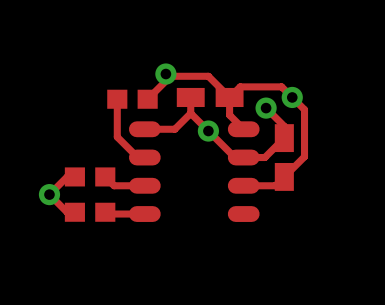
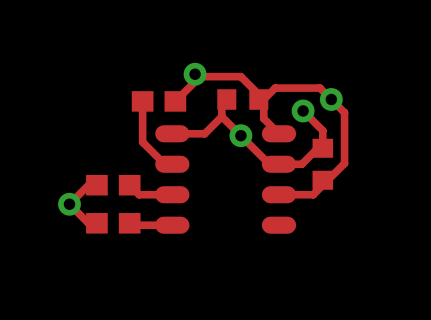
part footprint: [176, 87, 244, 108] -> [217, 89, 269, 110]
part footprint: [274, 124, 294, 191] -> [312, 138, 334, 190]

